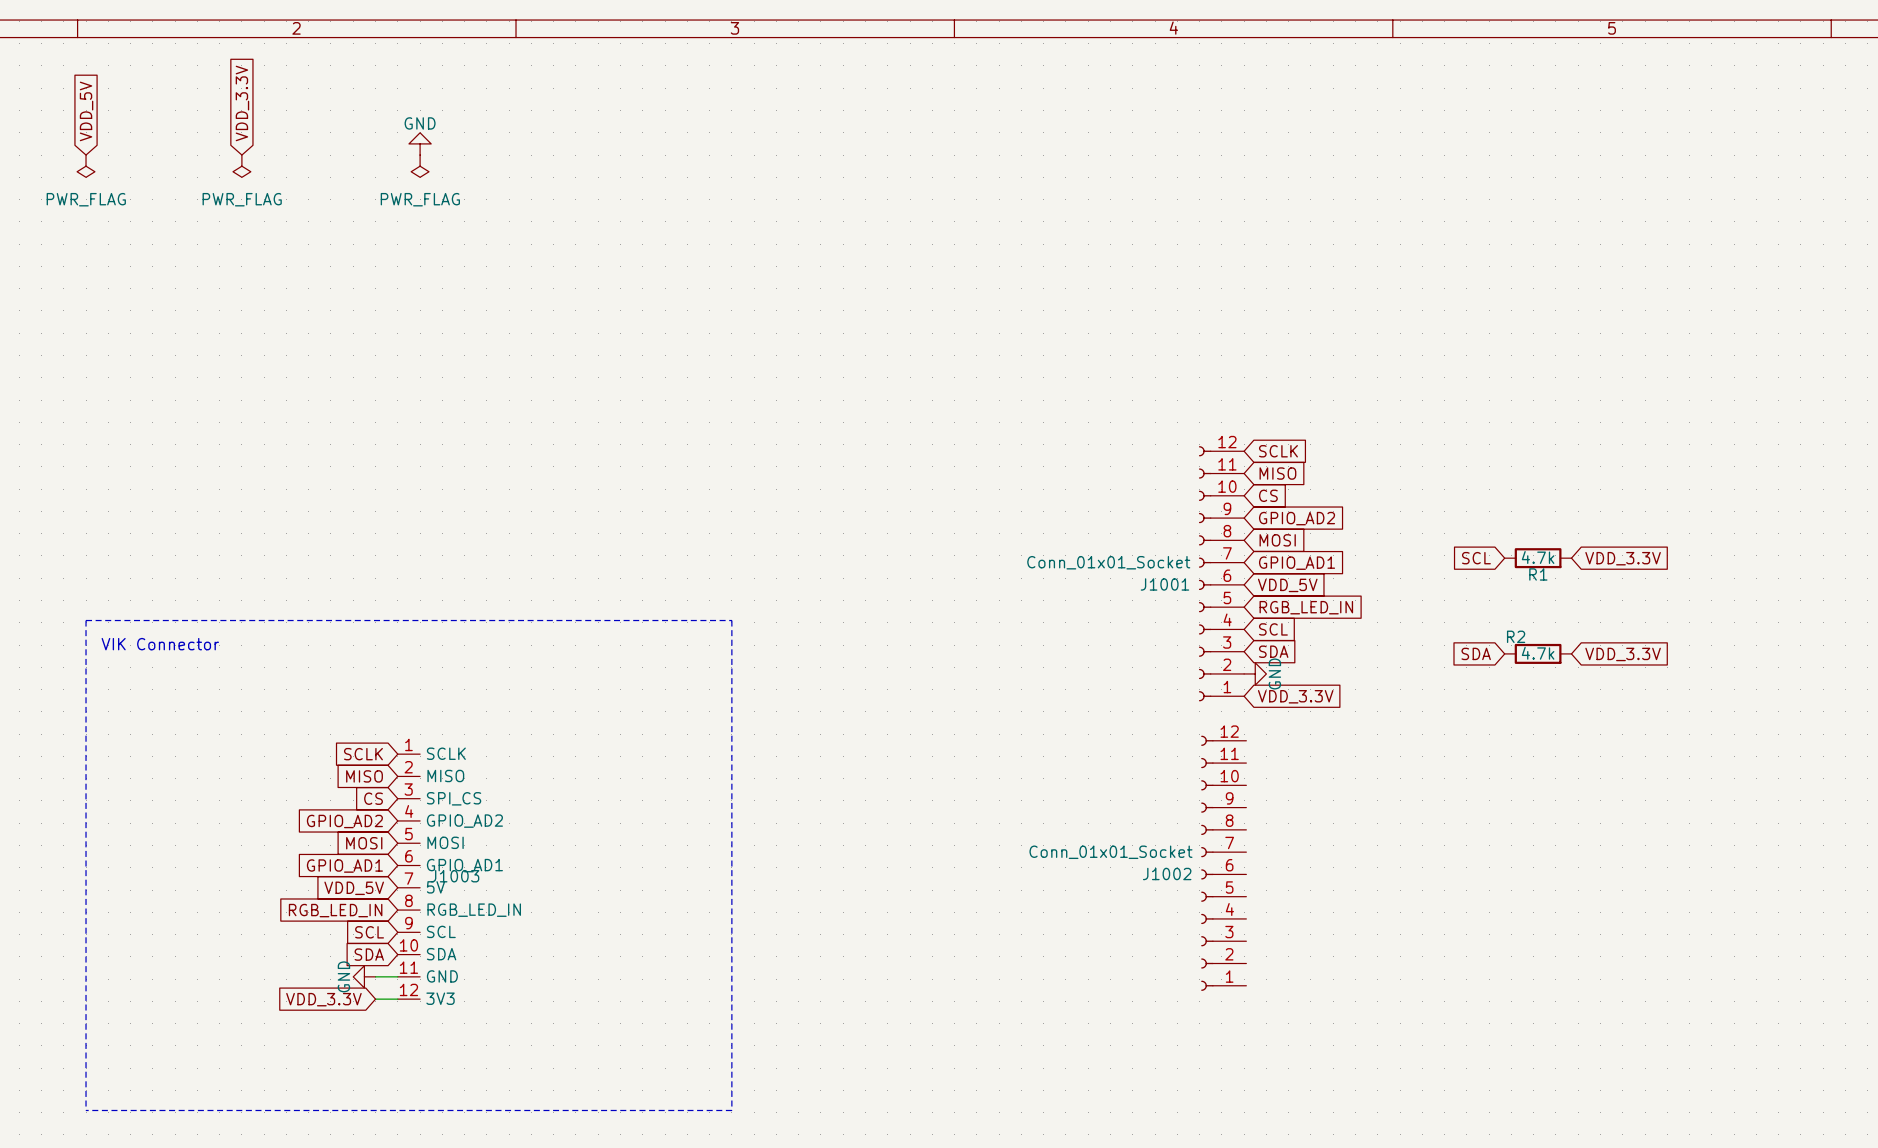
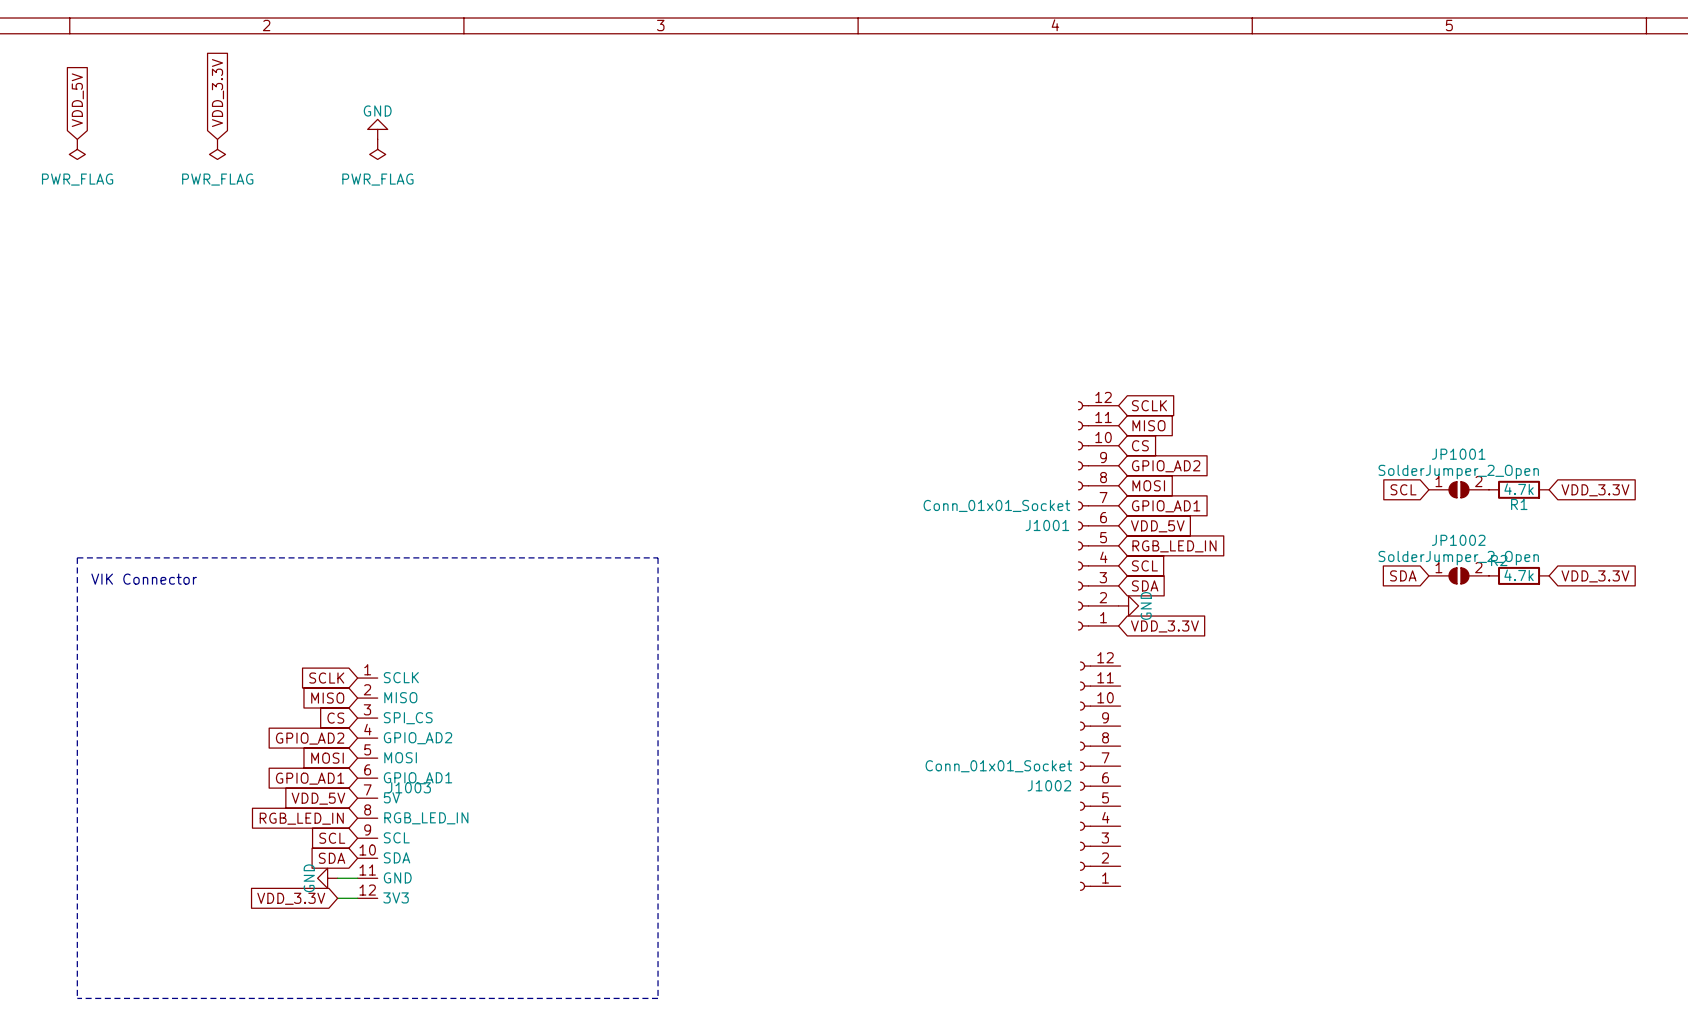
JP1001: none -> SolderJumper_2_Open (1458, 489)
global label: none -> VDD_3.3V (1595, 490)
global label position: SCL (1476, 558) -> SCL (1403, 489)
R1 position: (1538, 558) -> (1519, 489)
global label: VDD_3.3V (1623, 558) -> none
JP1002: none -> SolderJumper_2_Open (1458, 575)
global label: none -> VDD_3.3V (1595, 576)
global label position: SDA (1476, 653) -> SDA (1403, 575)
R2 position: (1538, 653) -> (1519, 575)
global label: VDD_3.3V (1623, 654) -> none

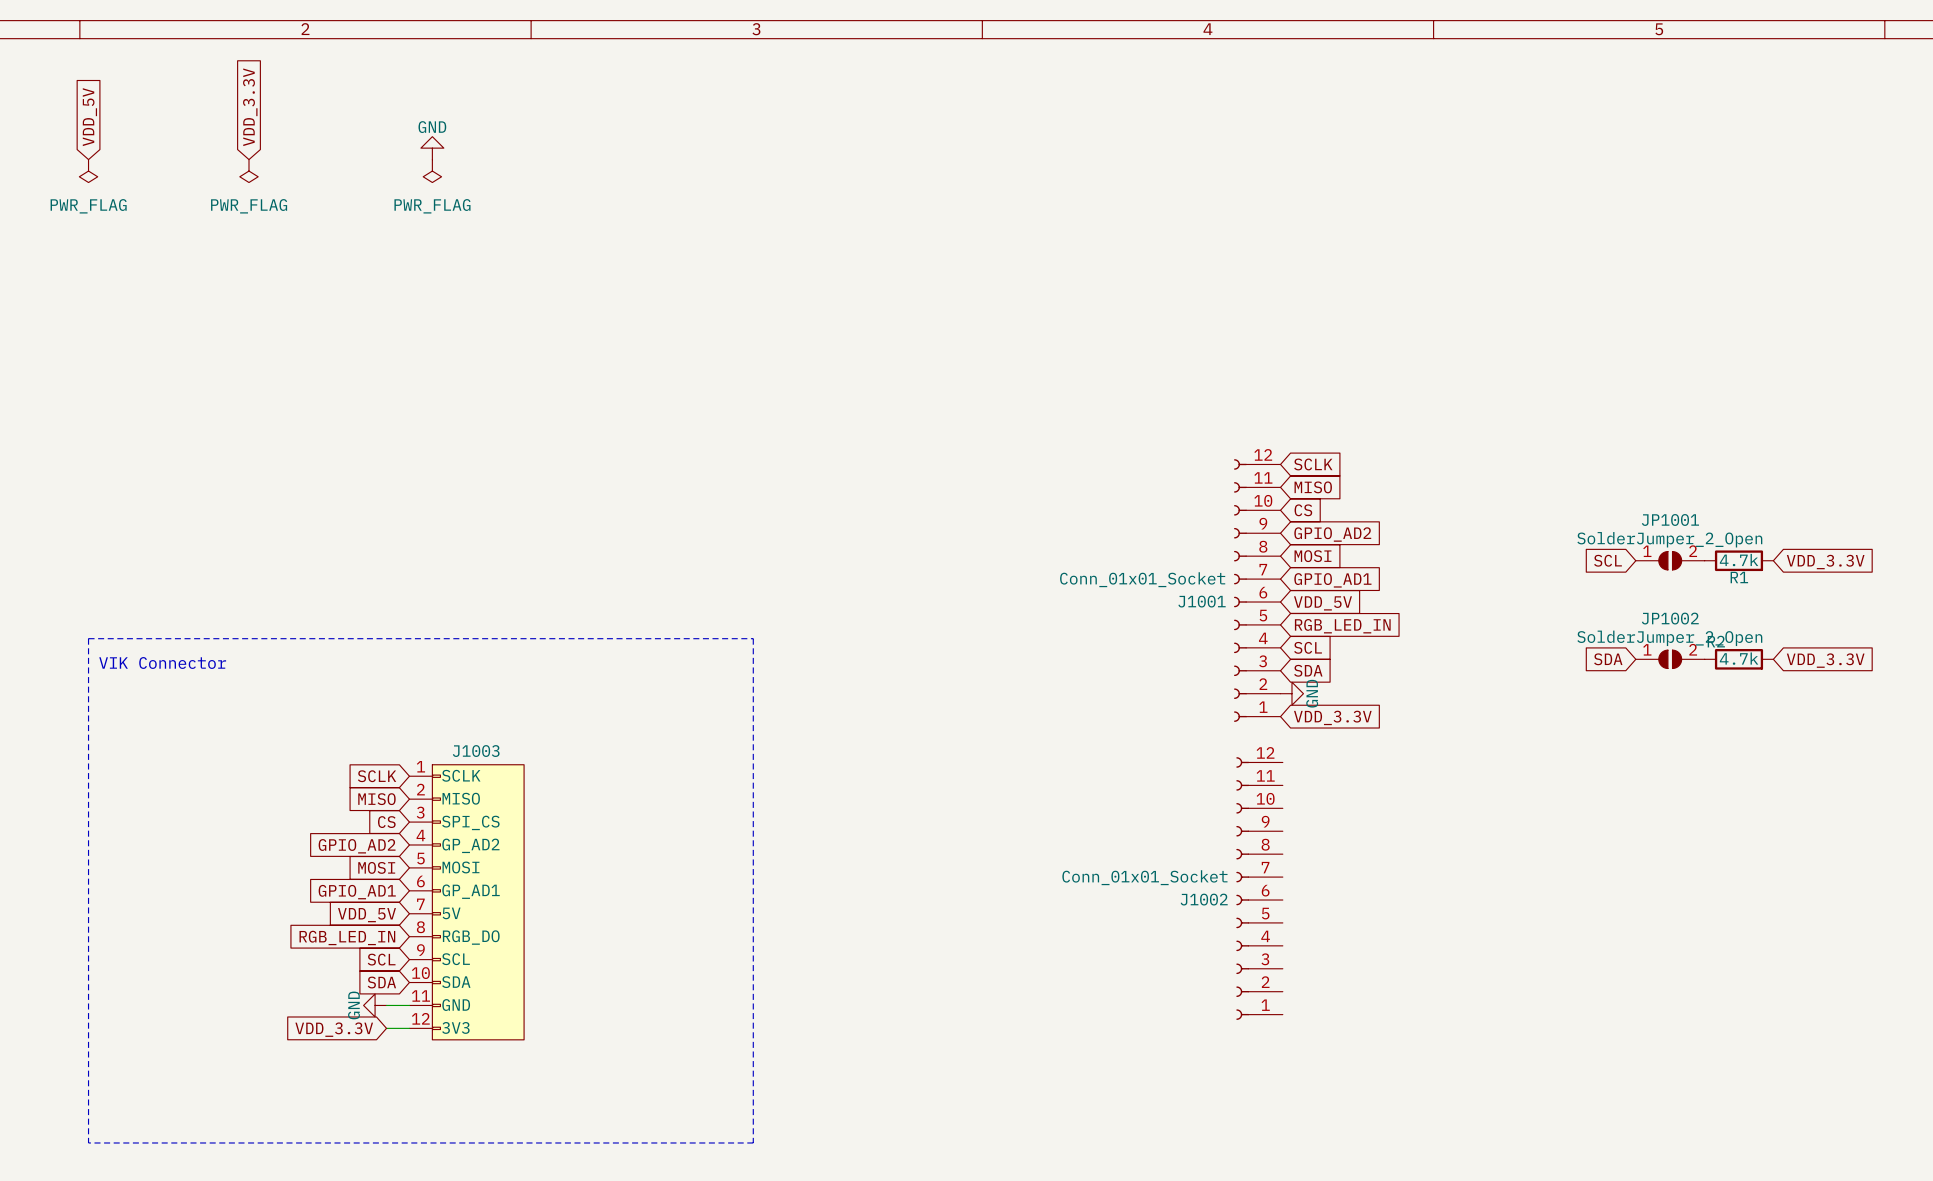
J1003 symbol: [357, 678, 378, 899] -> [409, 764, 525, 1040]
J1003 name position: J1003 (409, 787) -> J1003 (476, 751)

